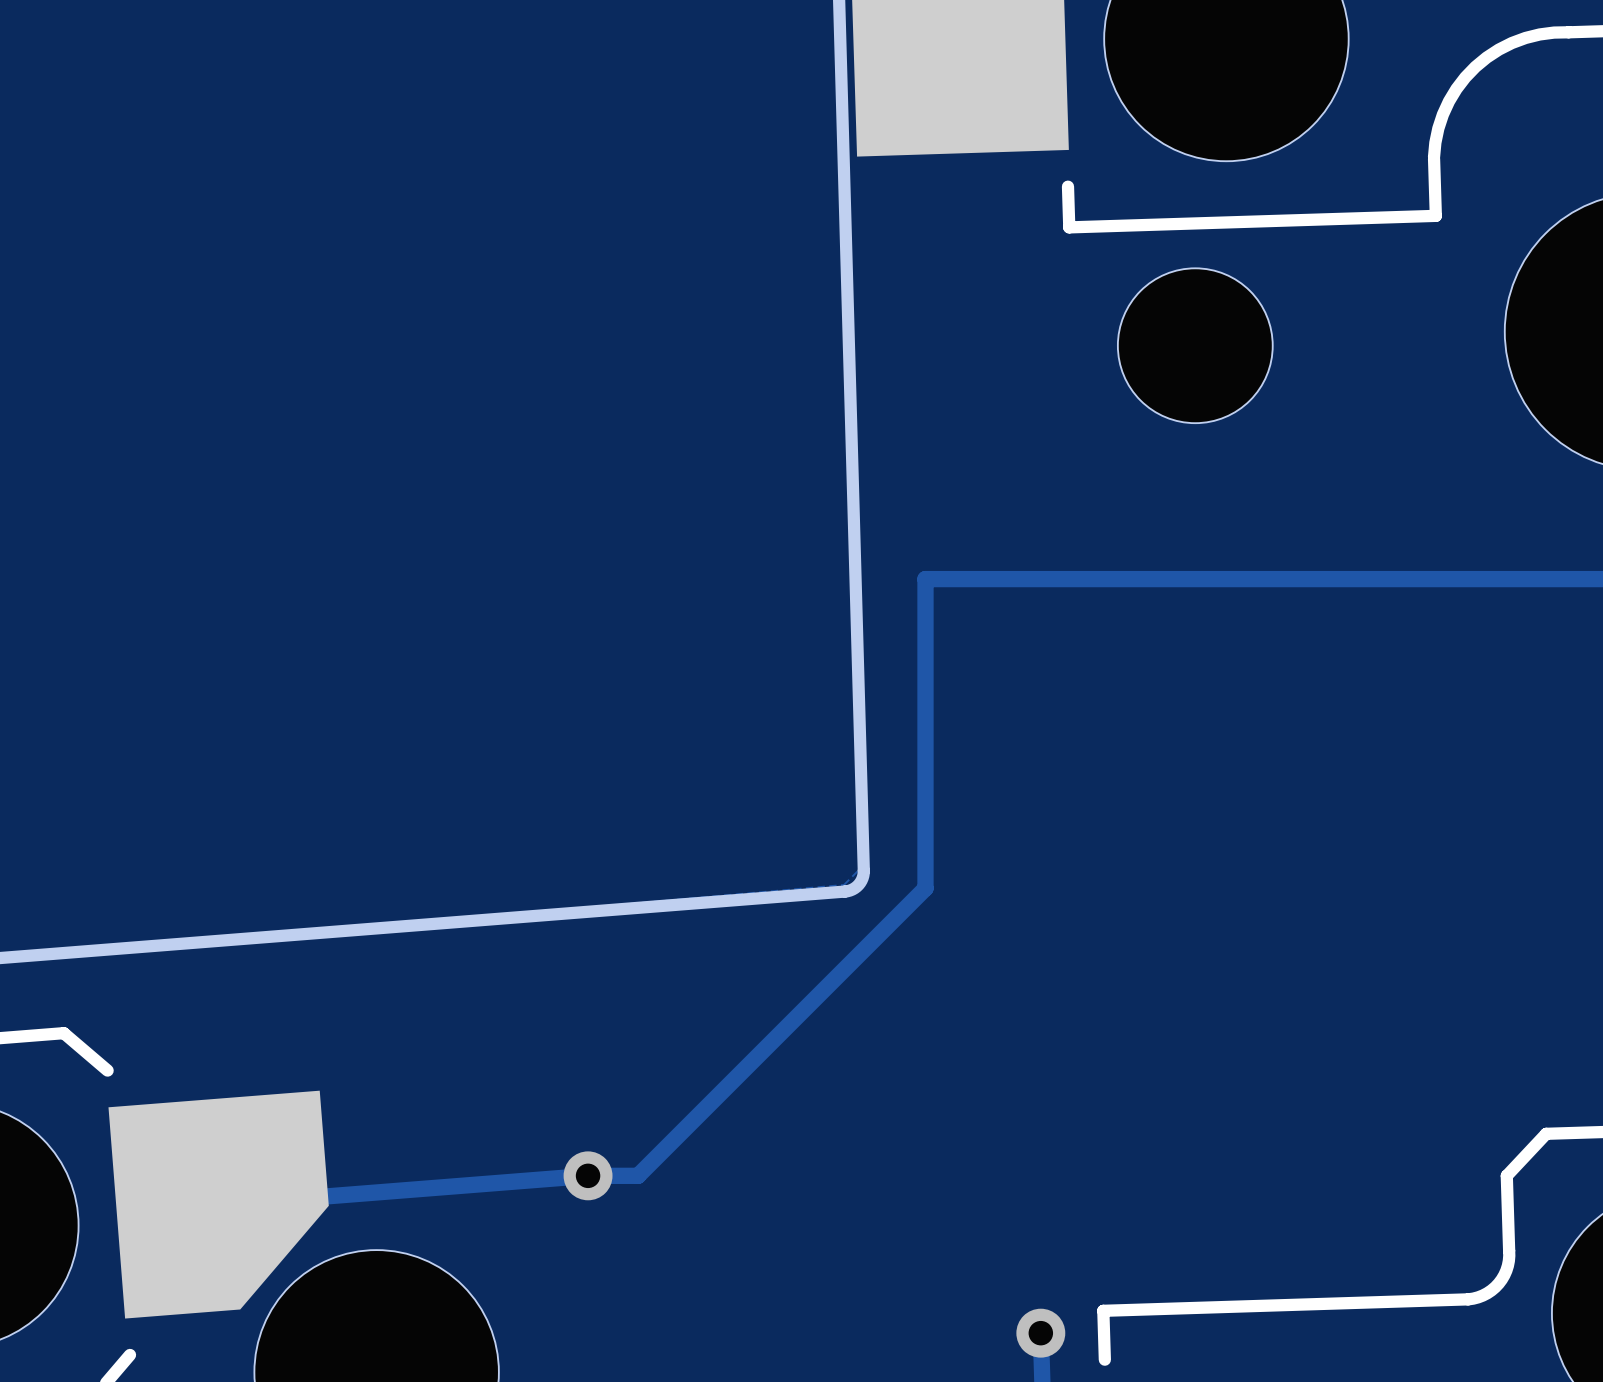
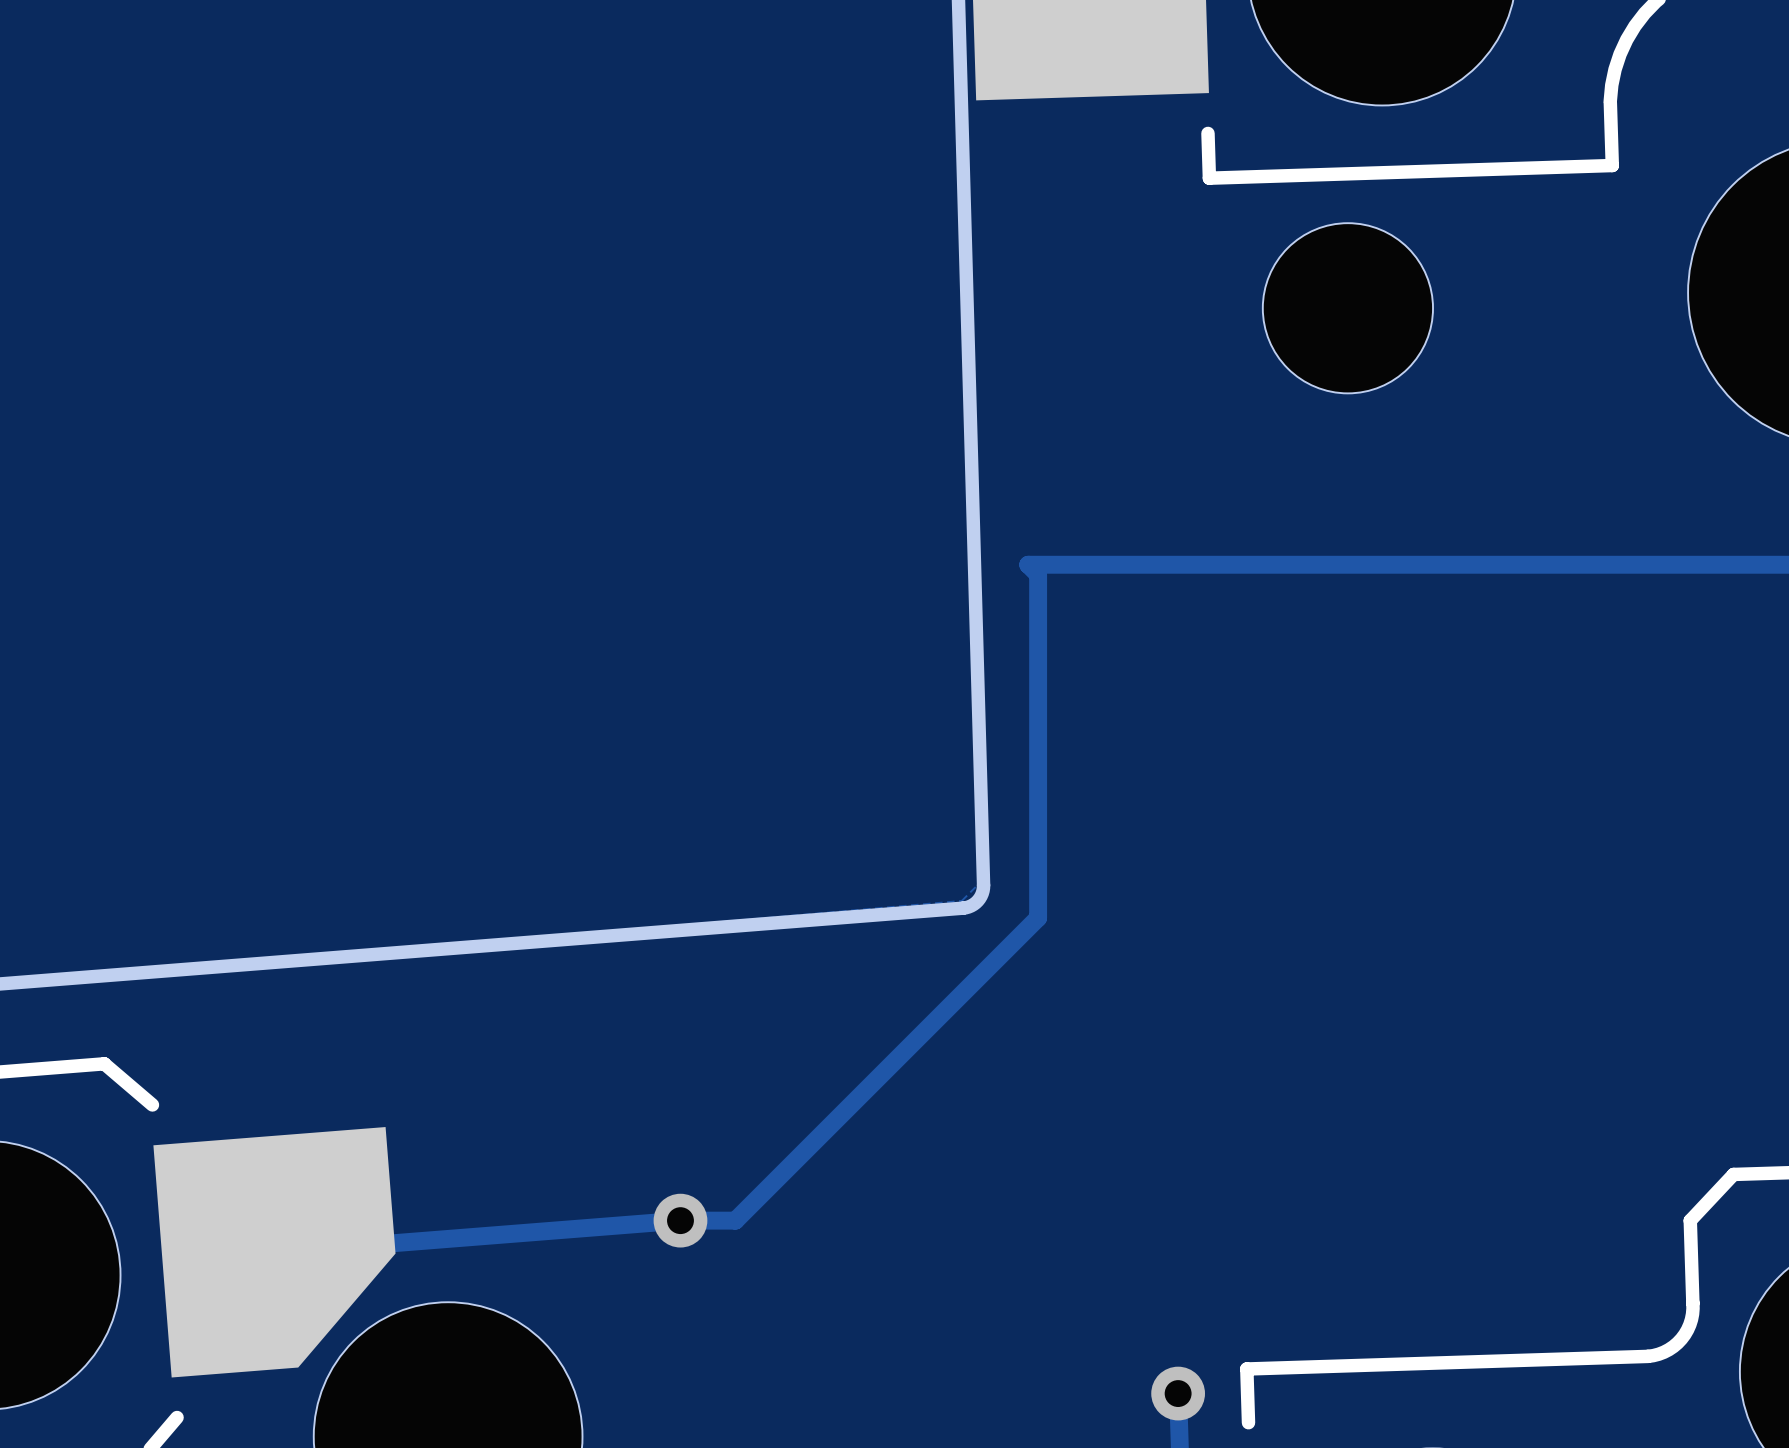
track: (925, 579) (925, 888) (913, 900) -> (1051, 564) (1028, 564) (1038, 574) (1038, 917)

